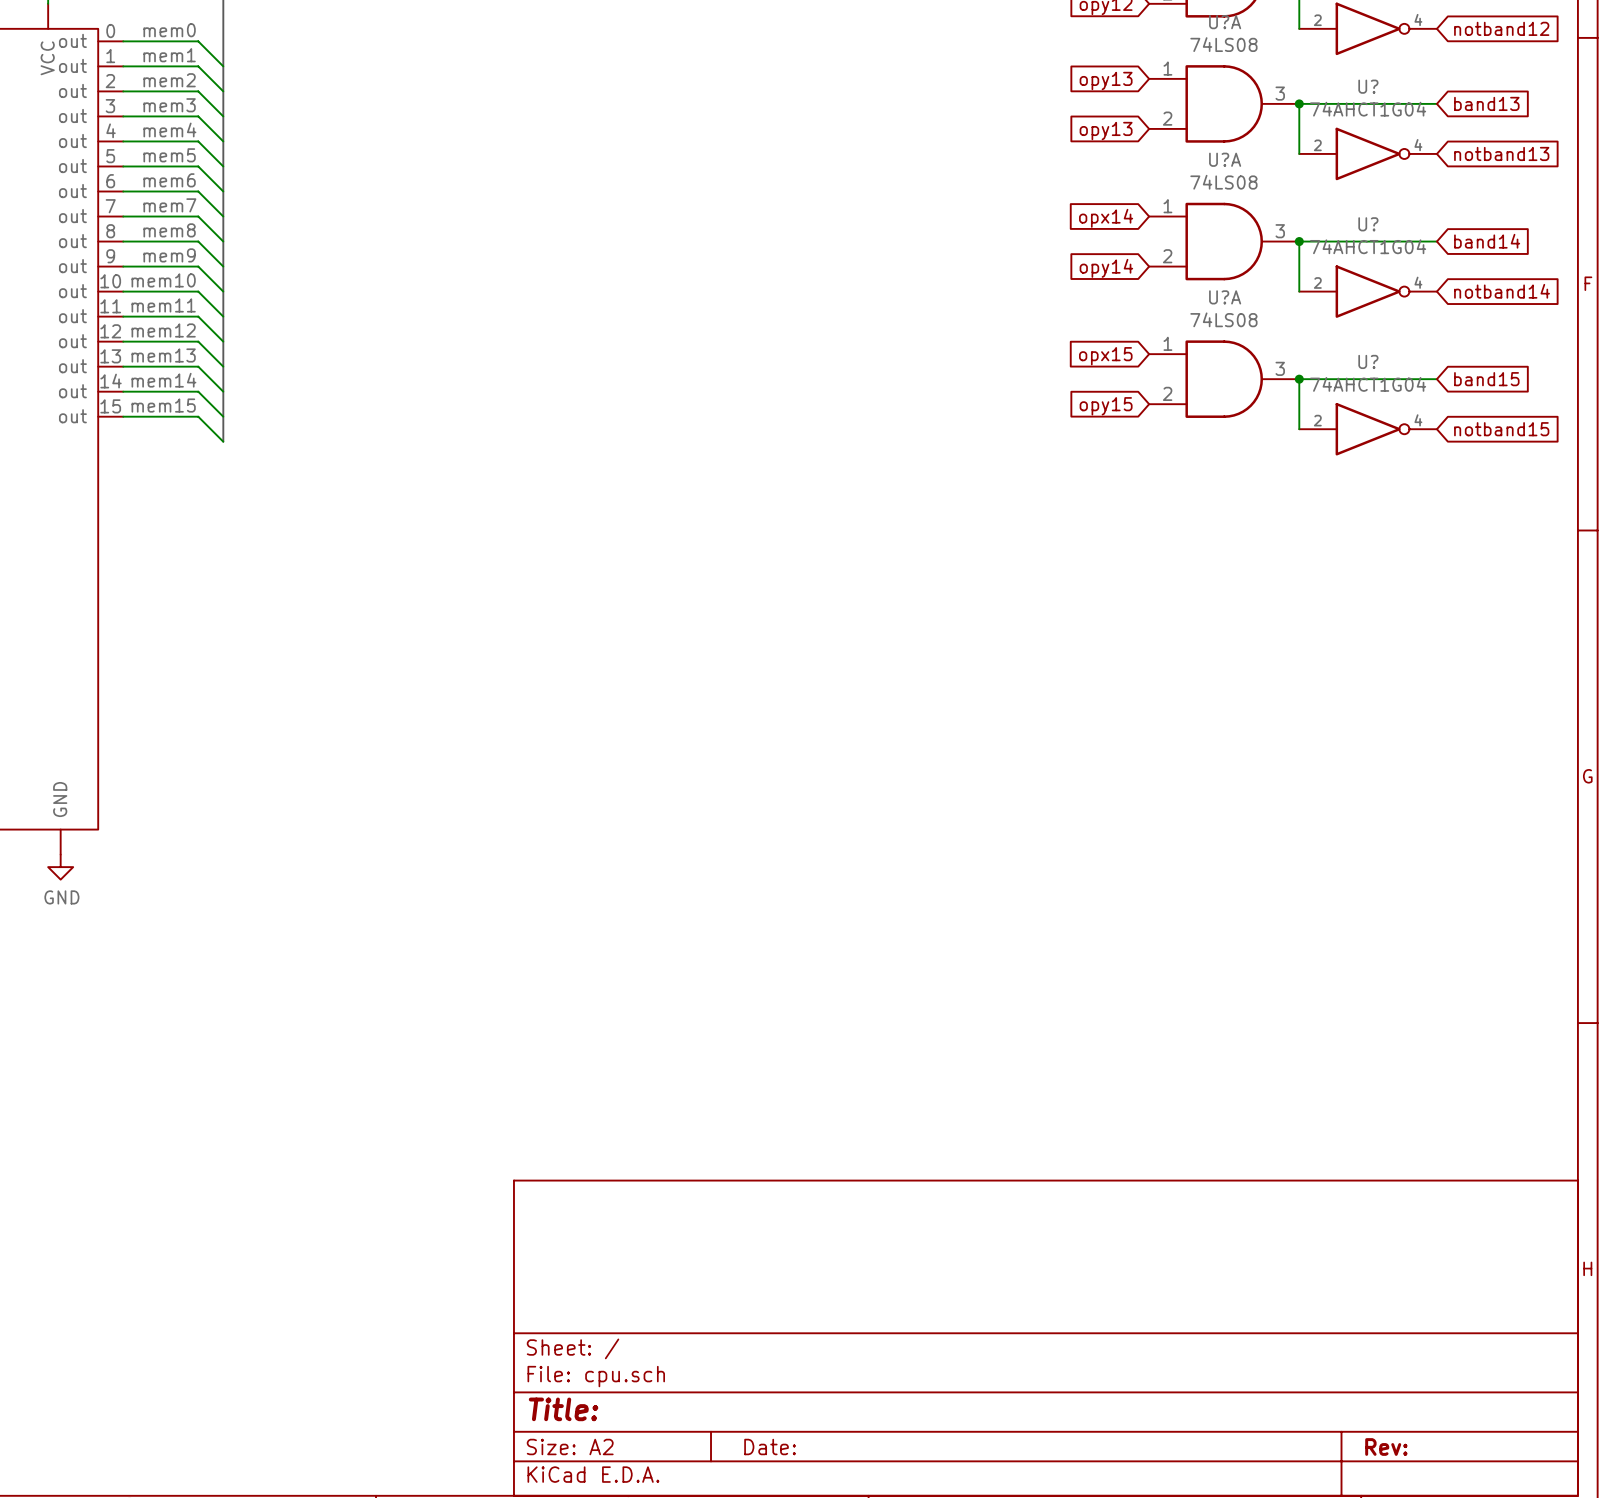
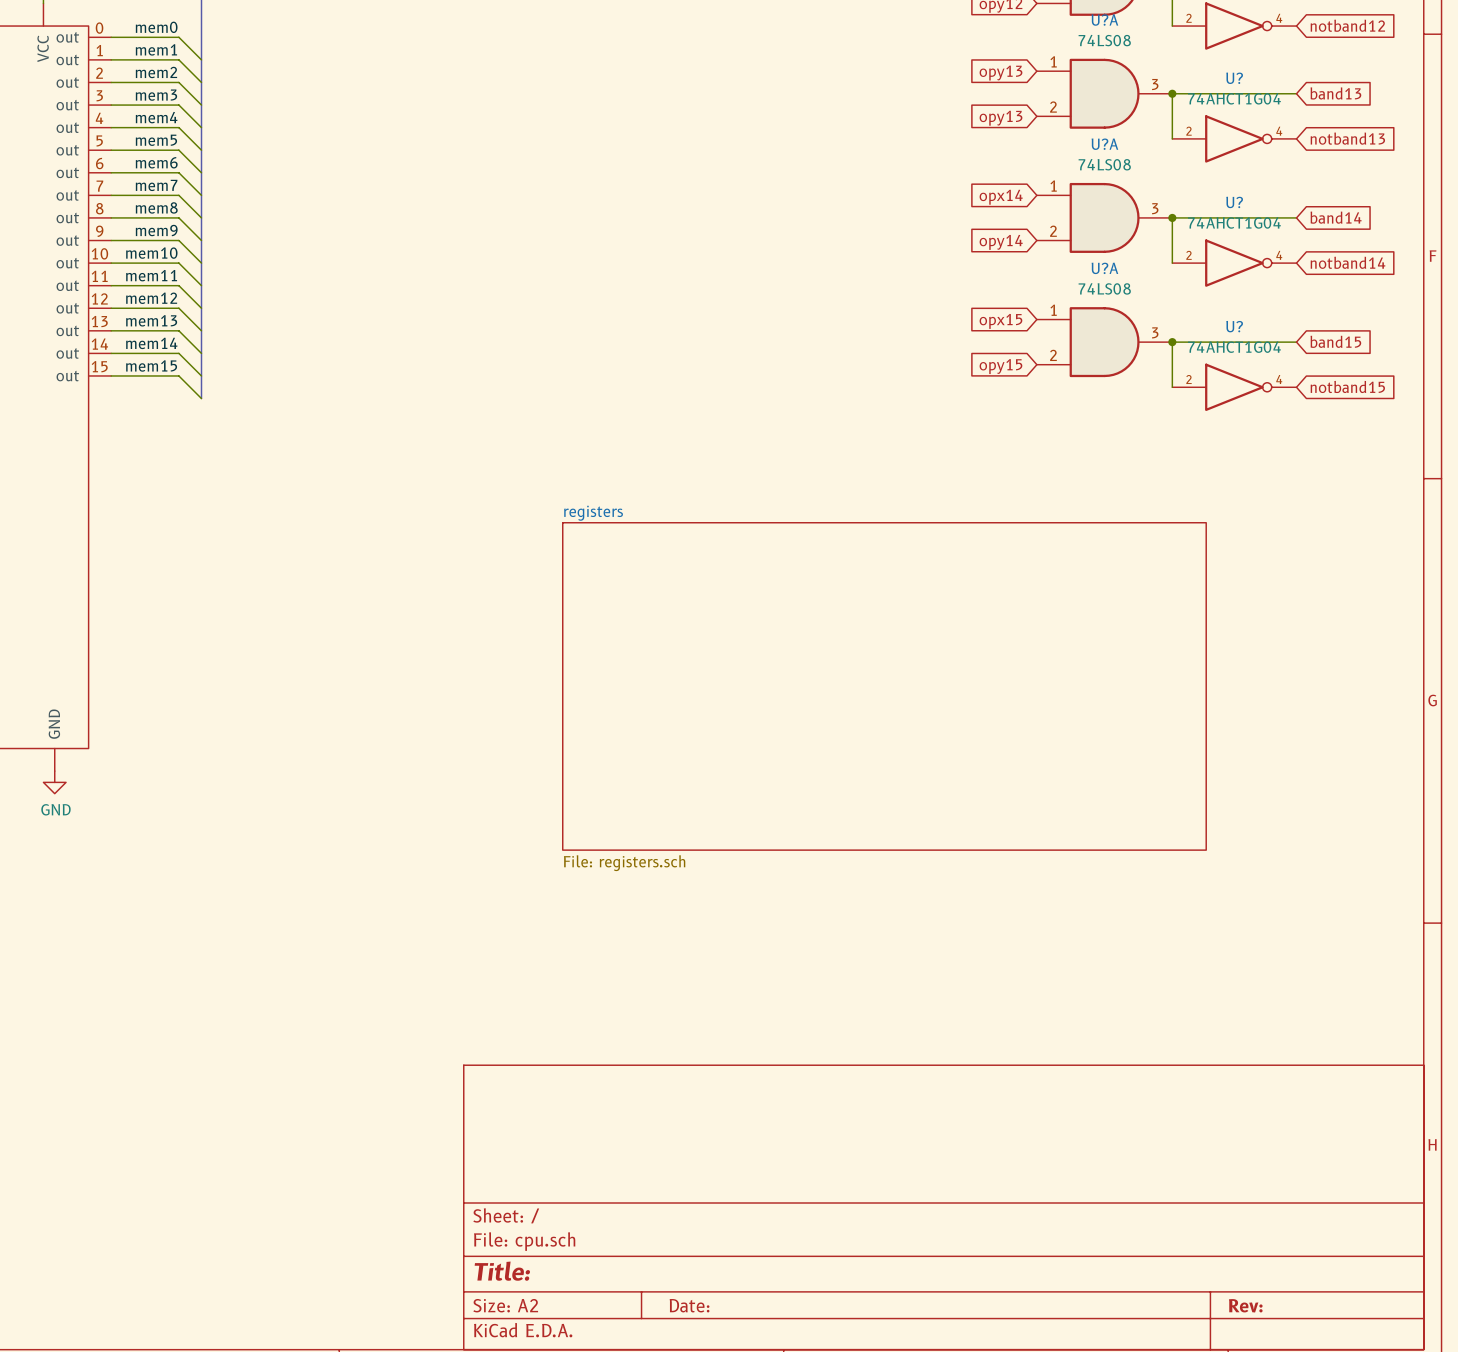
sheet registers: none -> File: registers.sch (884, 686)

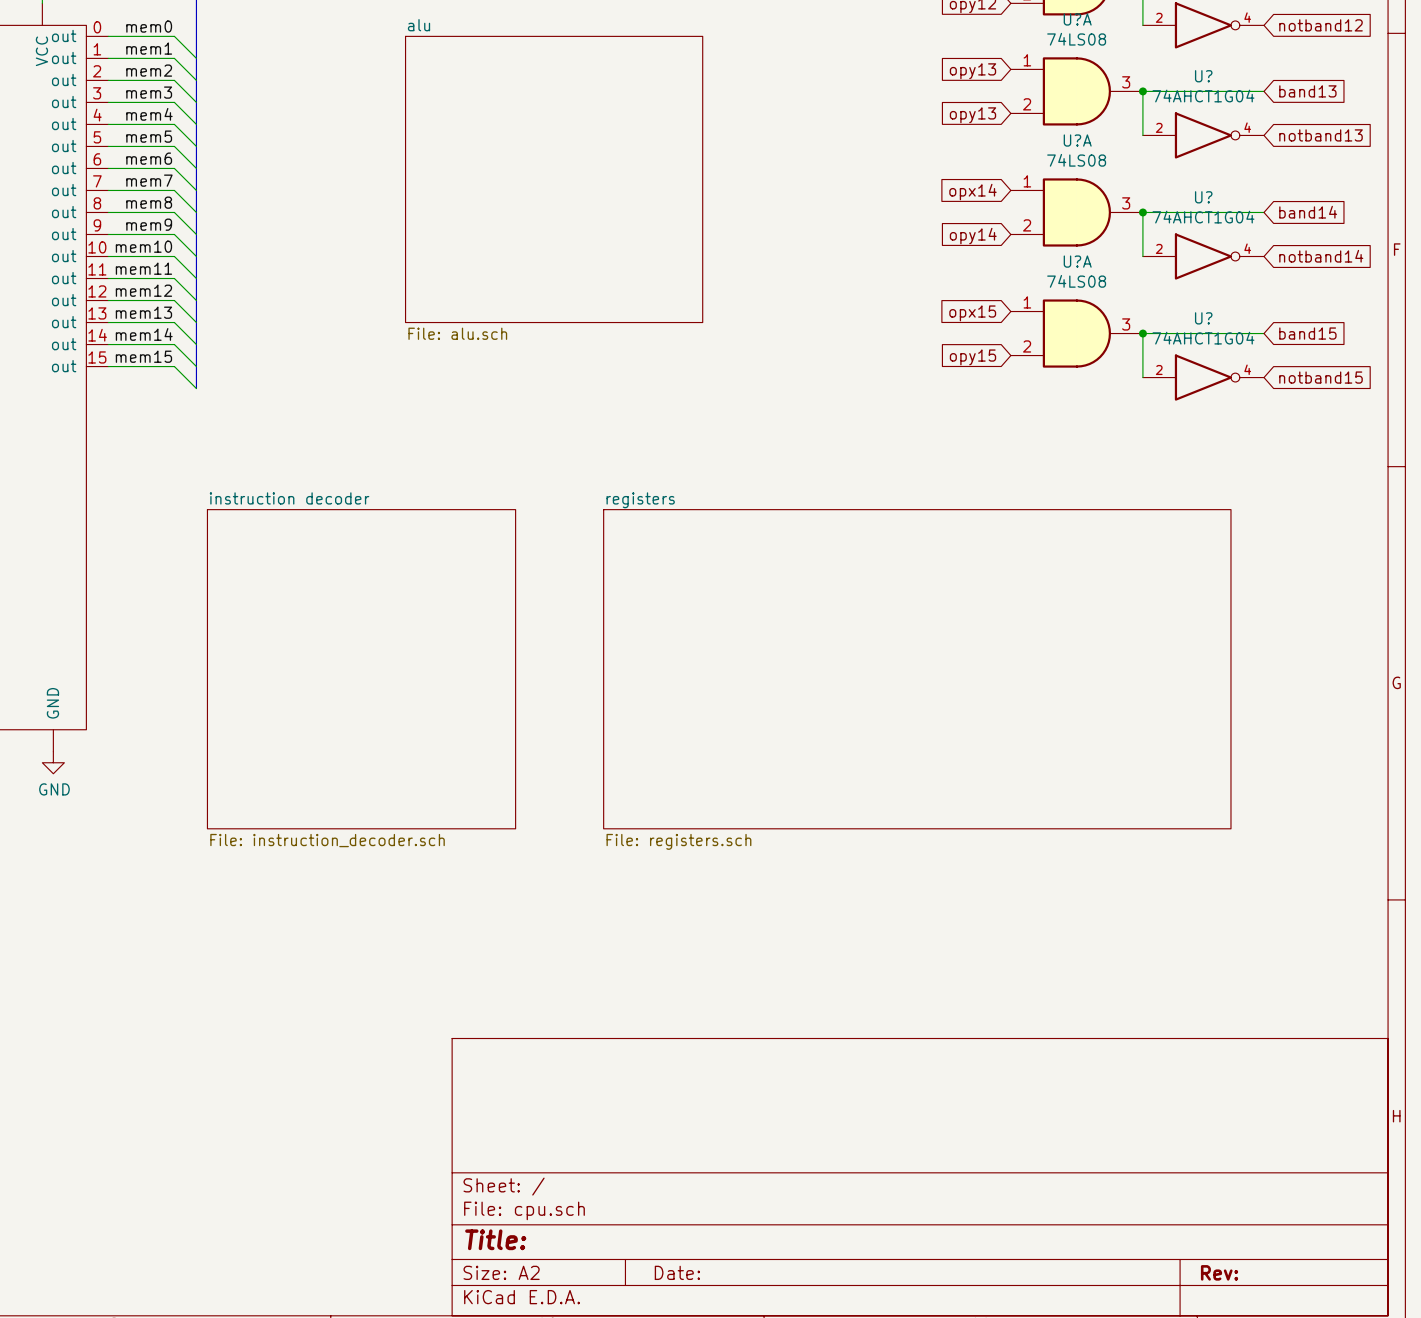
sheet alu: none -> File: alu.sch (554, 179)
sheet instruction decoder: none -> File: instruction_decoder.sch (361, 669)
sheet registers position: (884, 686) -> (917, 669)

